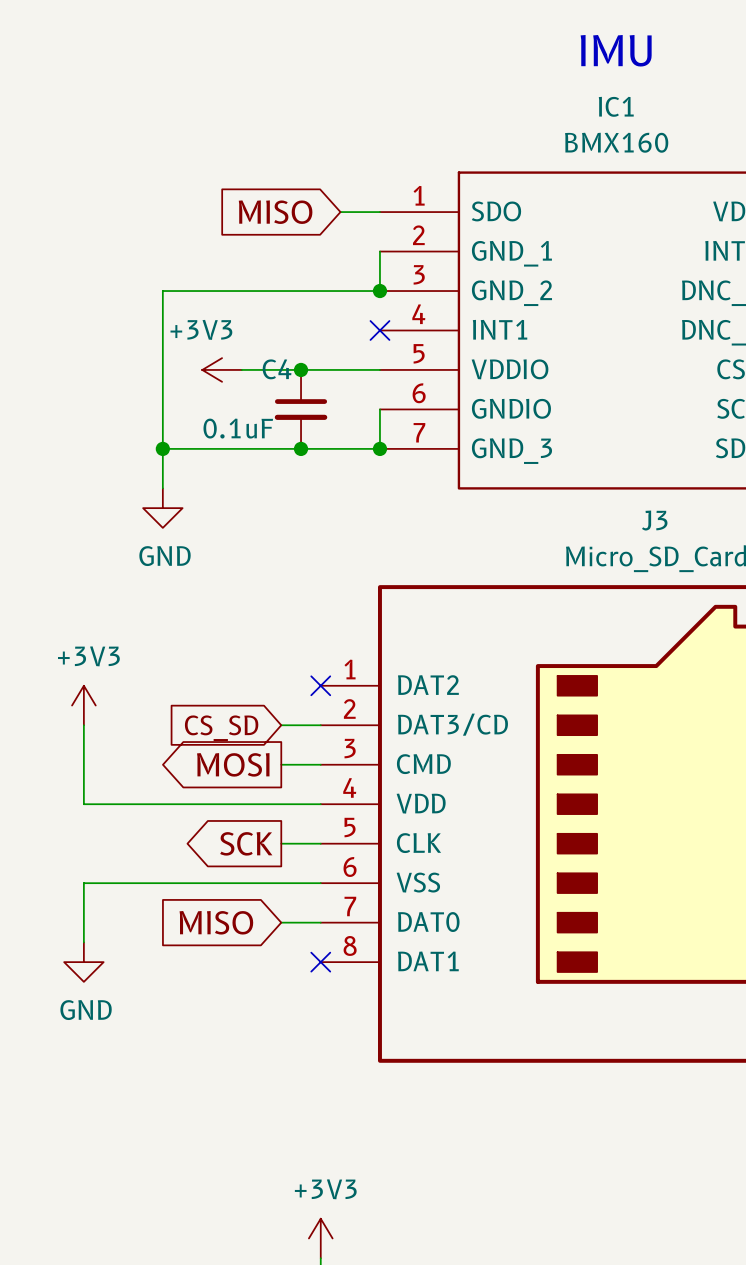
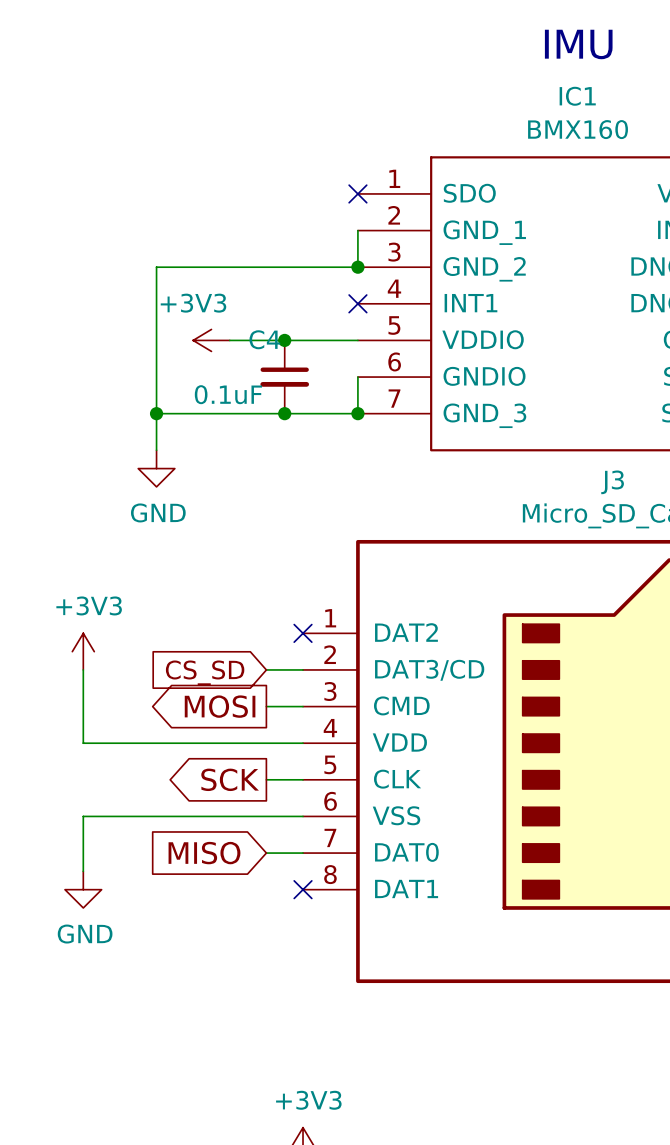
global label: MISO (275, 212) -> none
wire: (340, 212) (379, 212) -> none
no-connect mark: none -> (357, 193)

